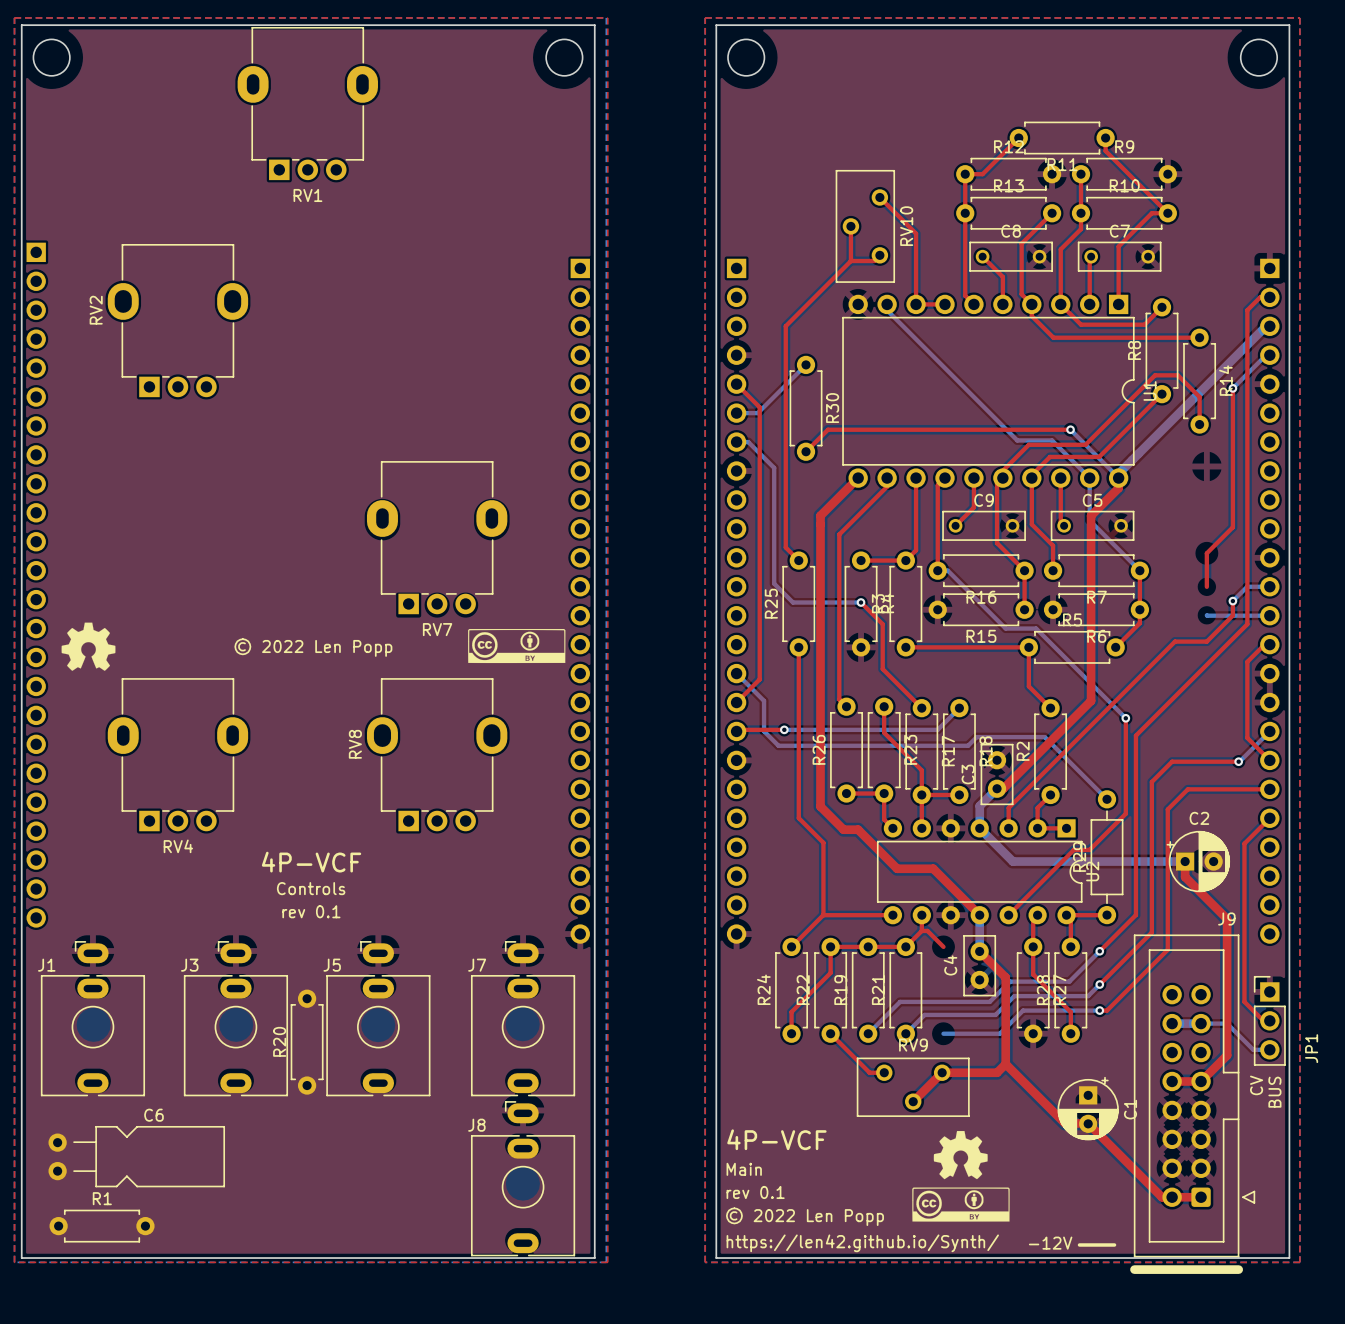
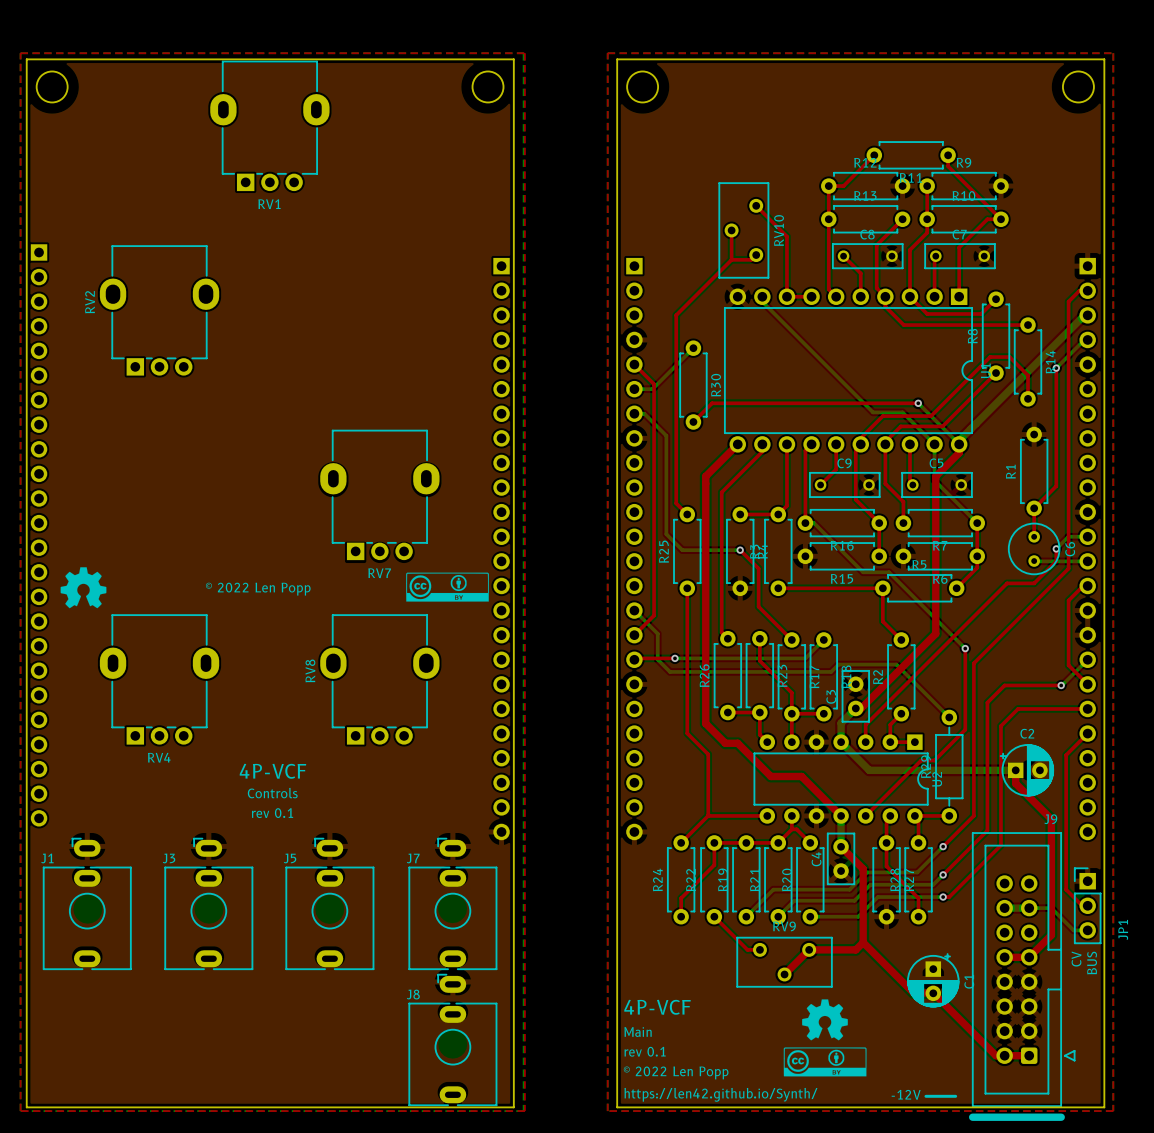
R20 position: (307, 1042) -> (810, 879)
C6 name position: C6 (153, 1115) -> C6 (1070, 549)
C6 footprint: [48, 1126, 225, 1188] -> [1008, 522, 1061, 575]
R1 name position: R1 (102, 1198) -> R1 (1010, 471)
R1 rotation: 0° (102, 1226) -> 90° clockwise (1034, 471)
R1 position: (102, 1226) -> (1034, 471)

